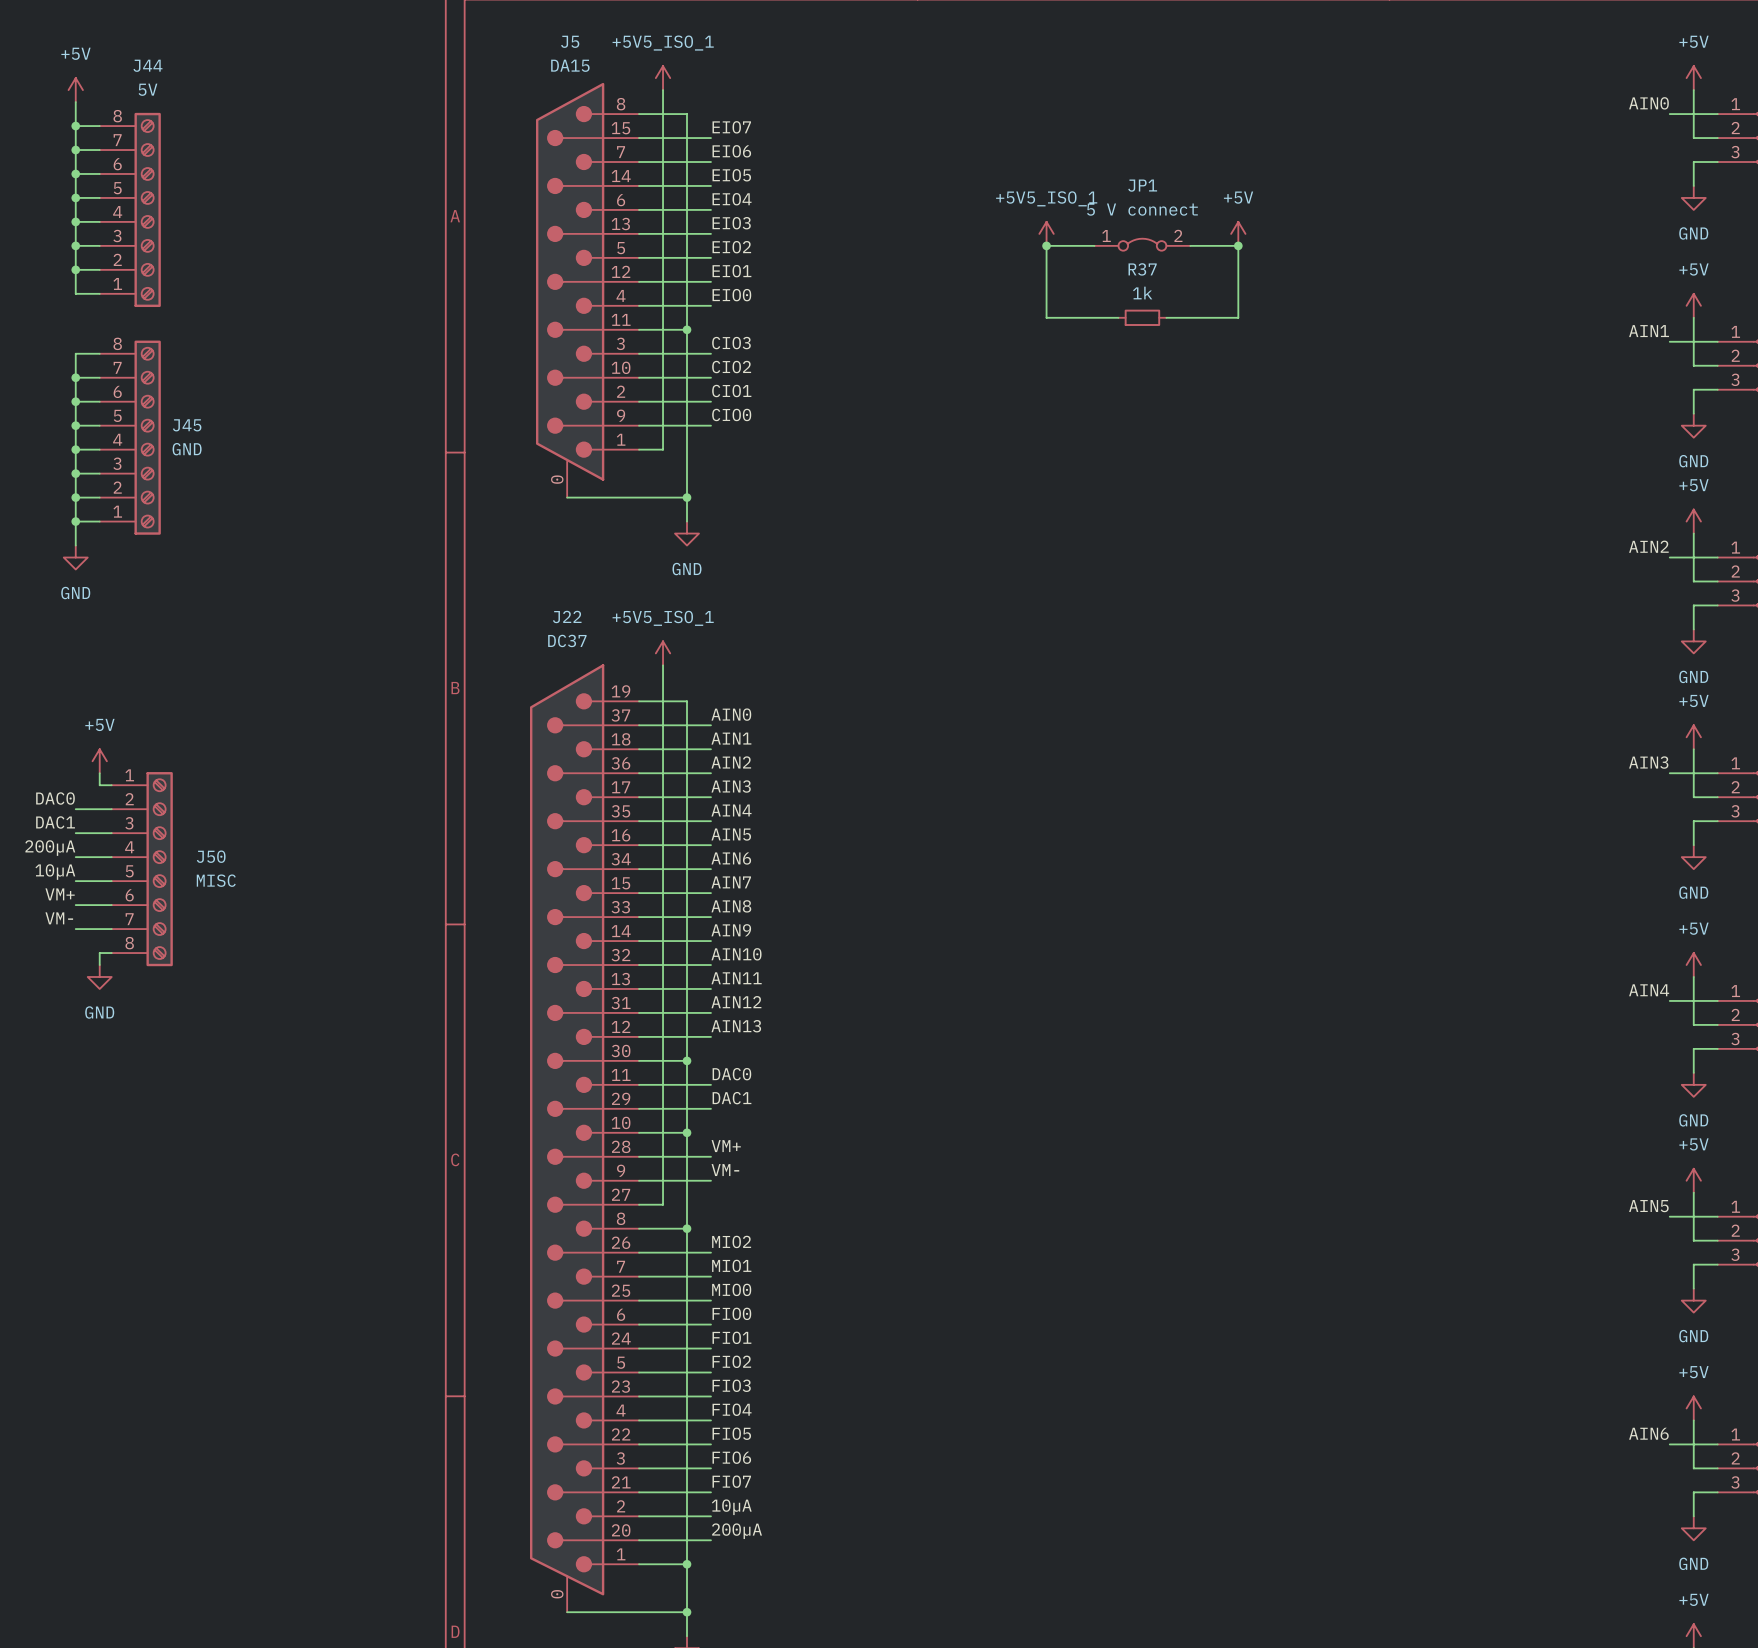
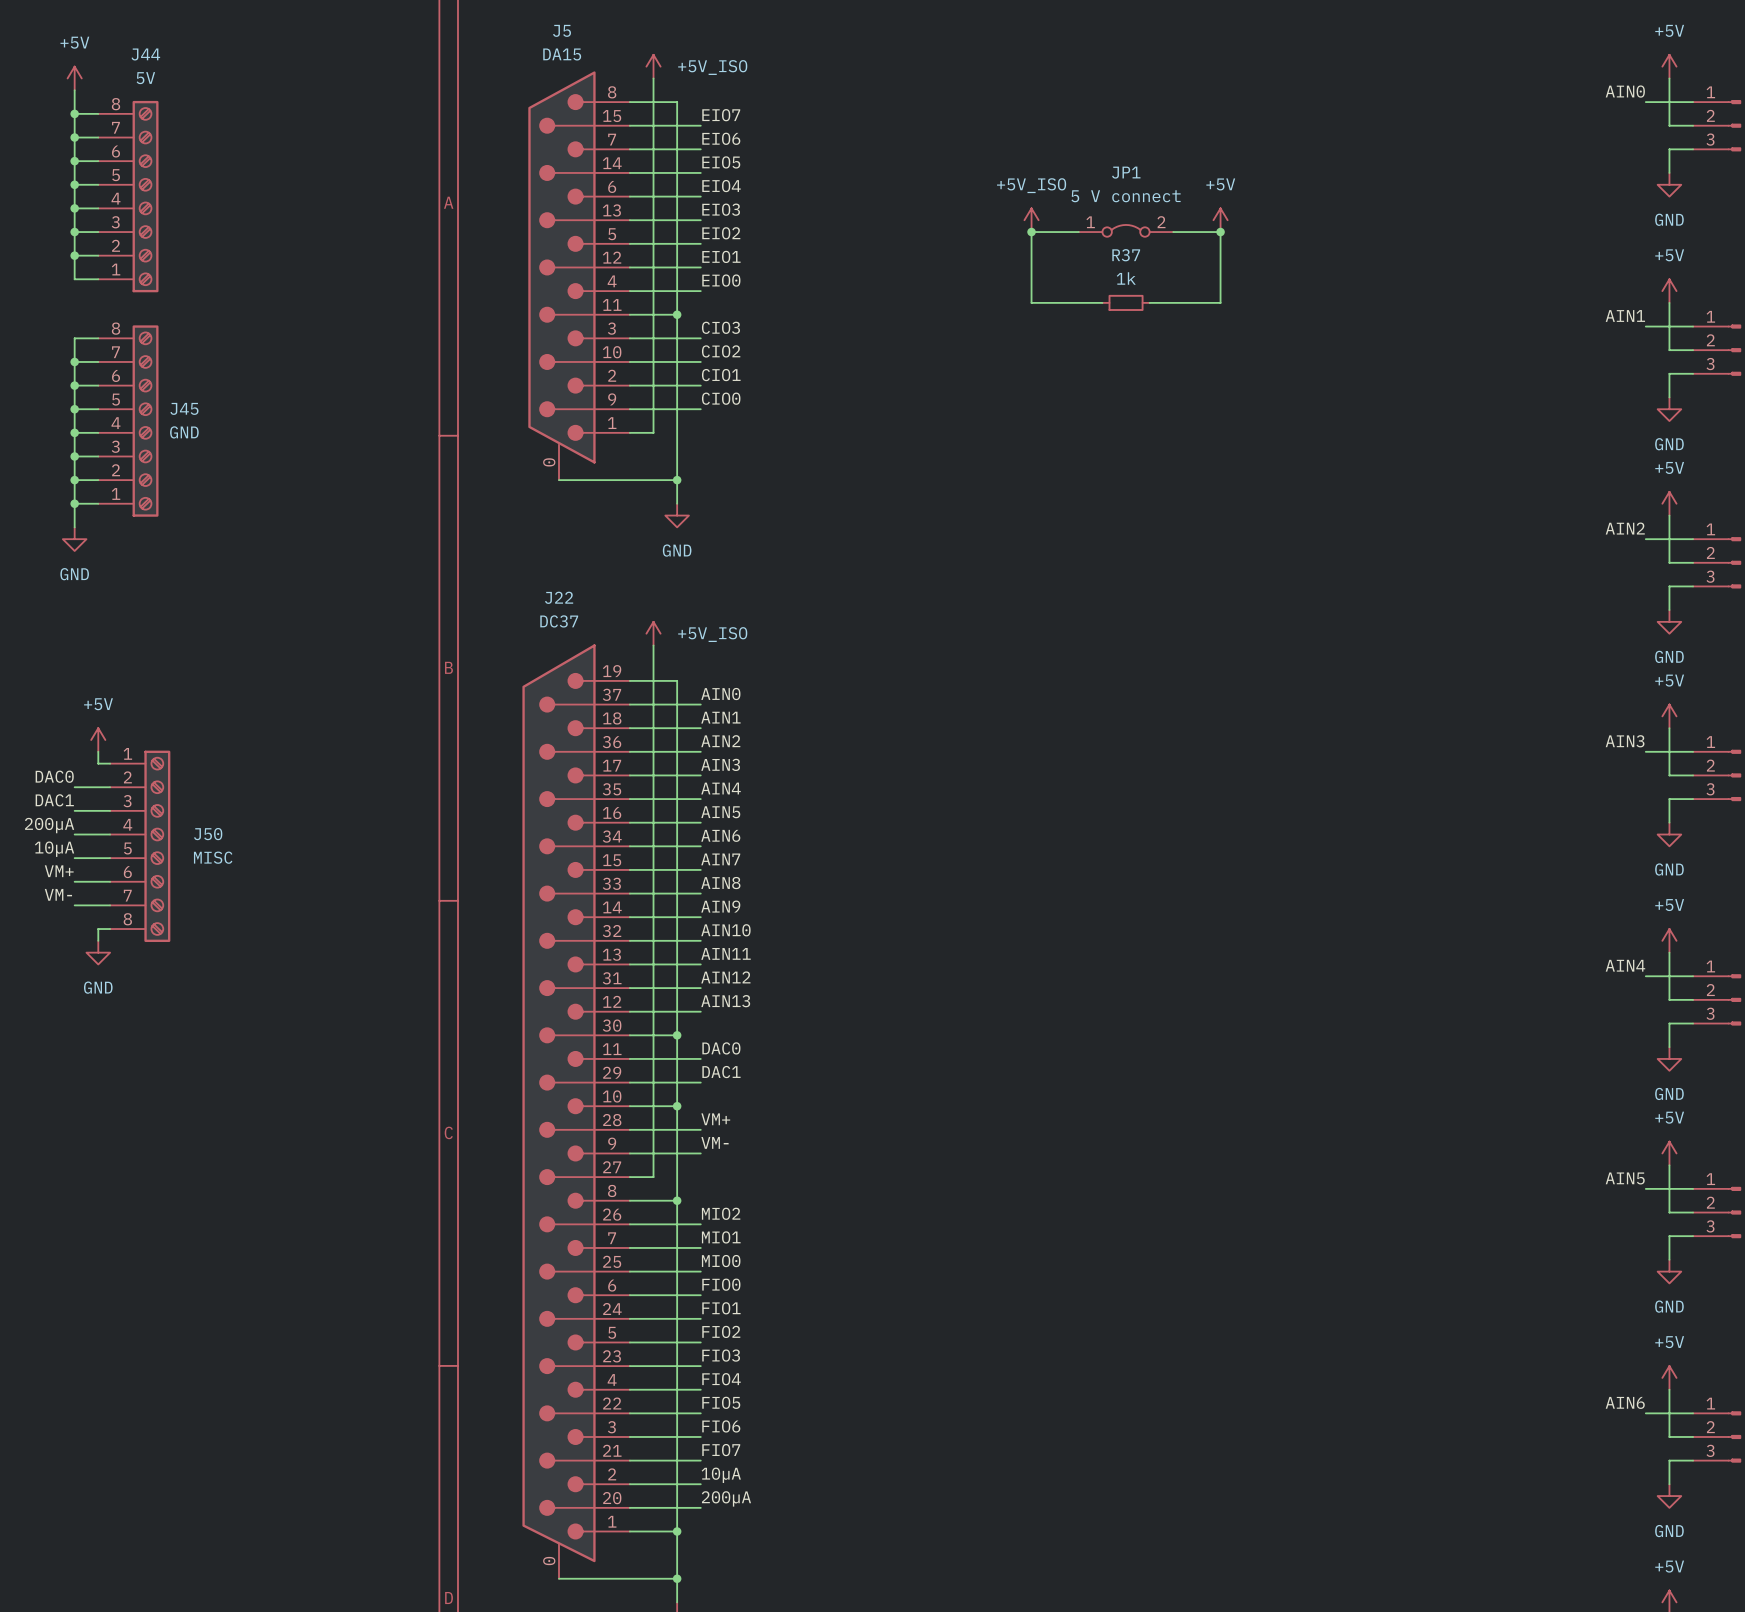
power symbol: +5V5_ISO_1 (663, 78) -> +5V_ISO (653, 66)
power symbol: +5V5_ISO_1 (1046, 233) -> +5V_ISO (1031, 220)
power symbol: +5V5_ISO_1 (663, 653) -> +5V_ISO (653, 633)

